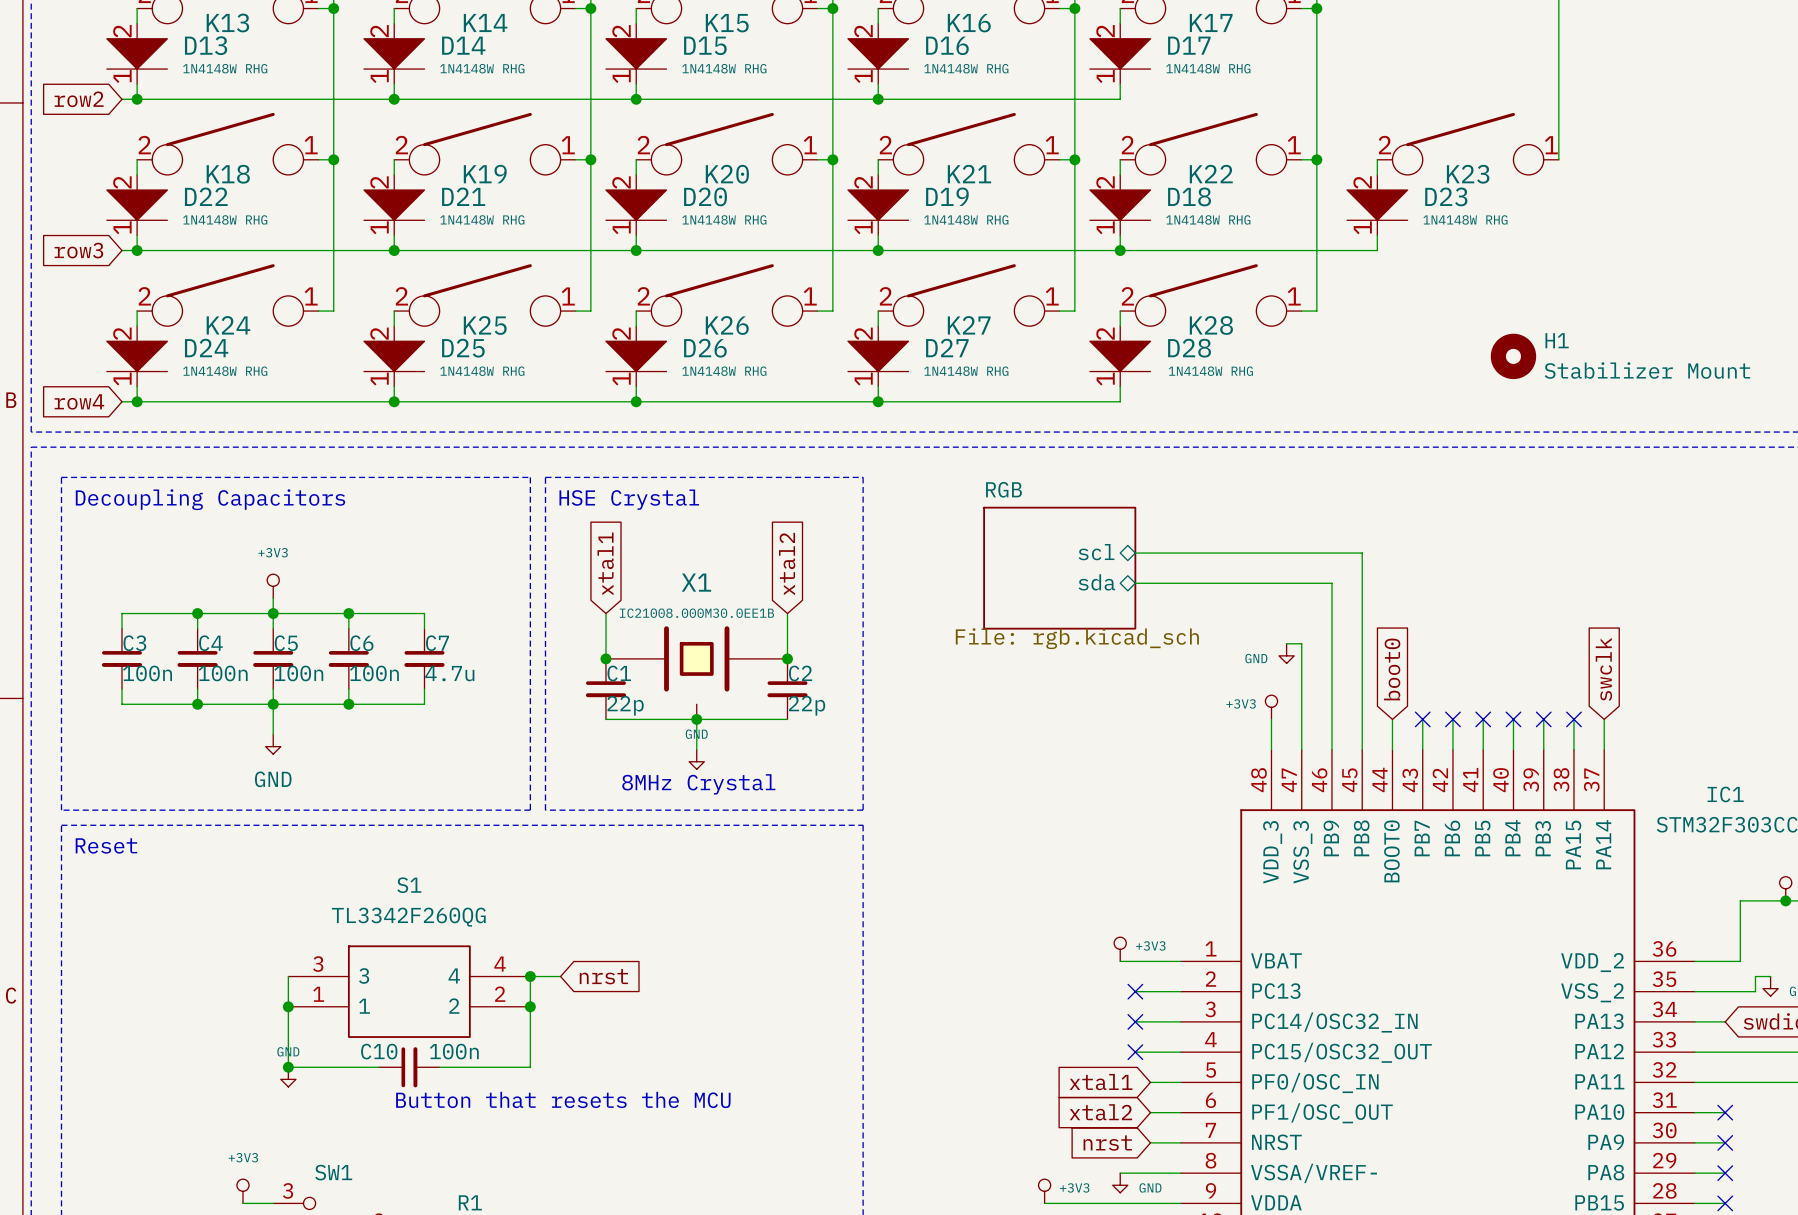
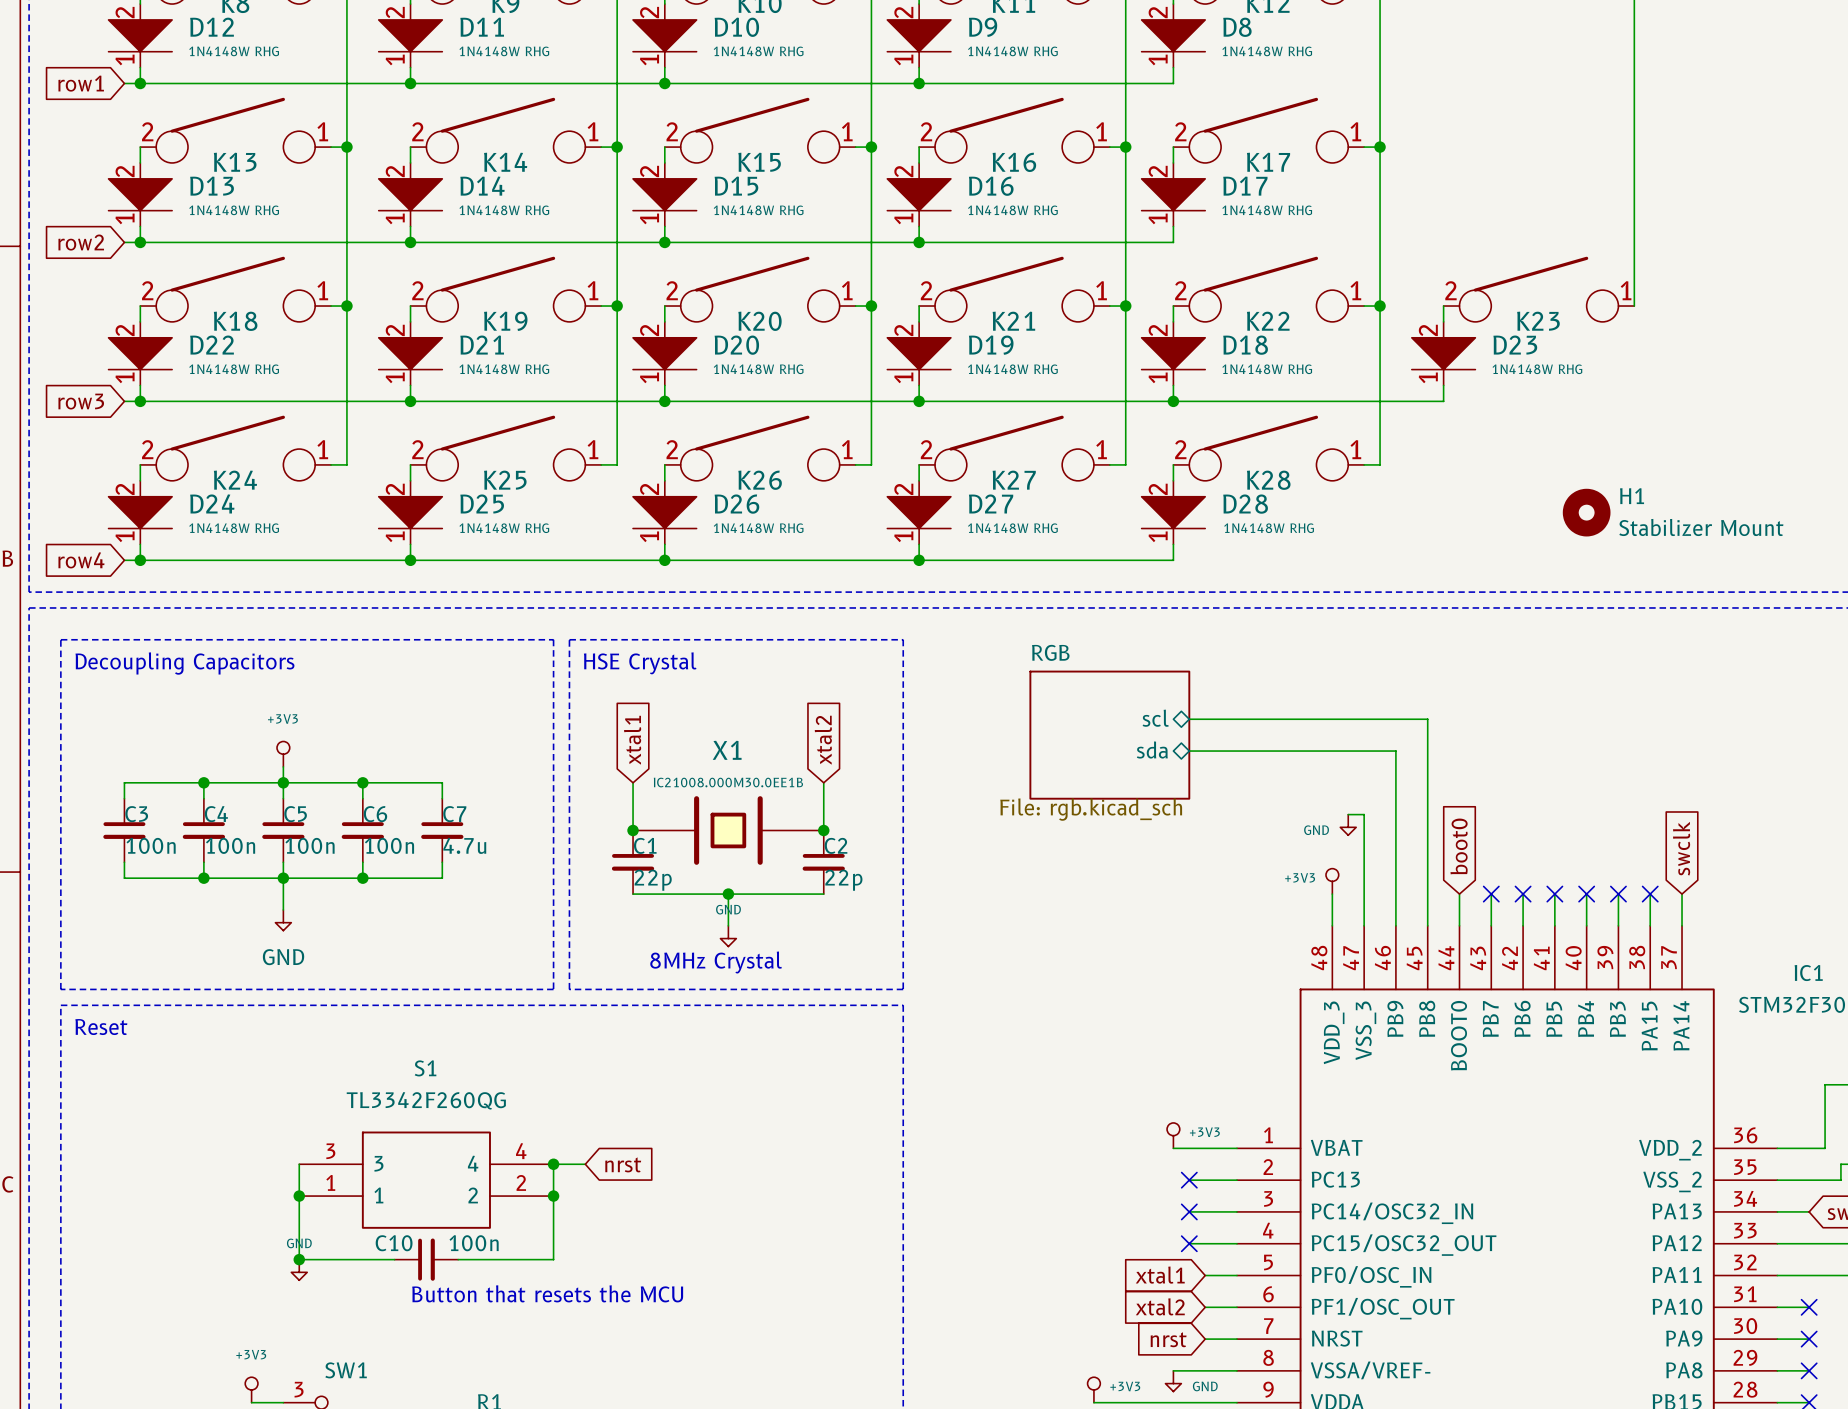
X1 symbol: [605, 626, 788, 720] -> [633, 796, 824, 865]

